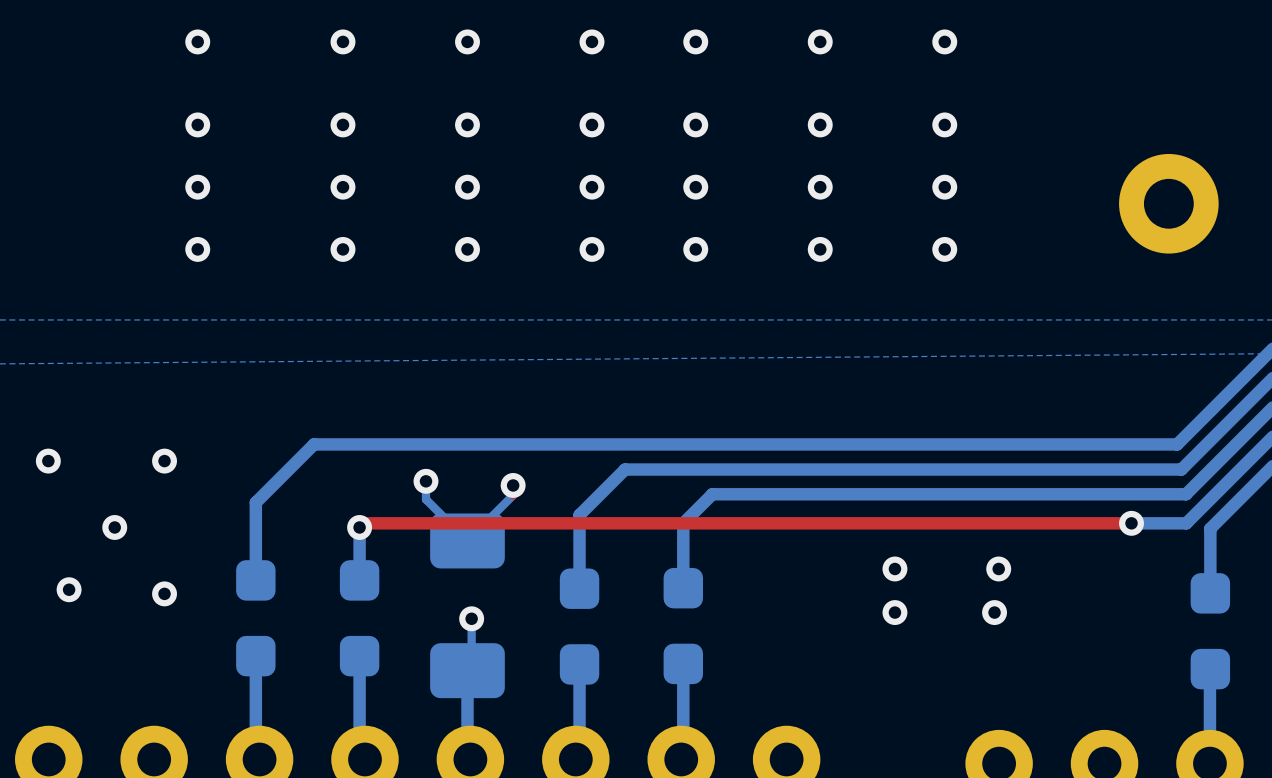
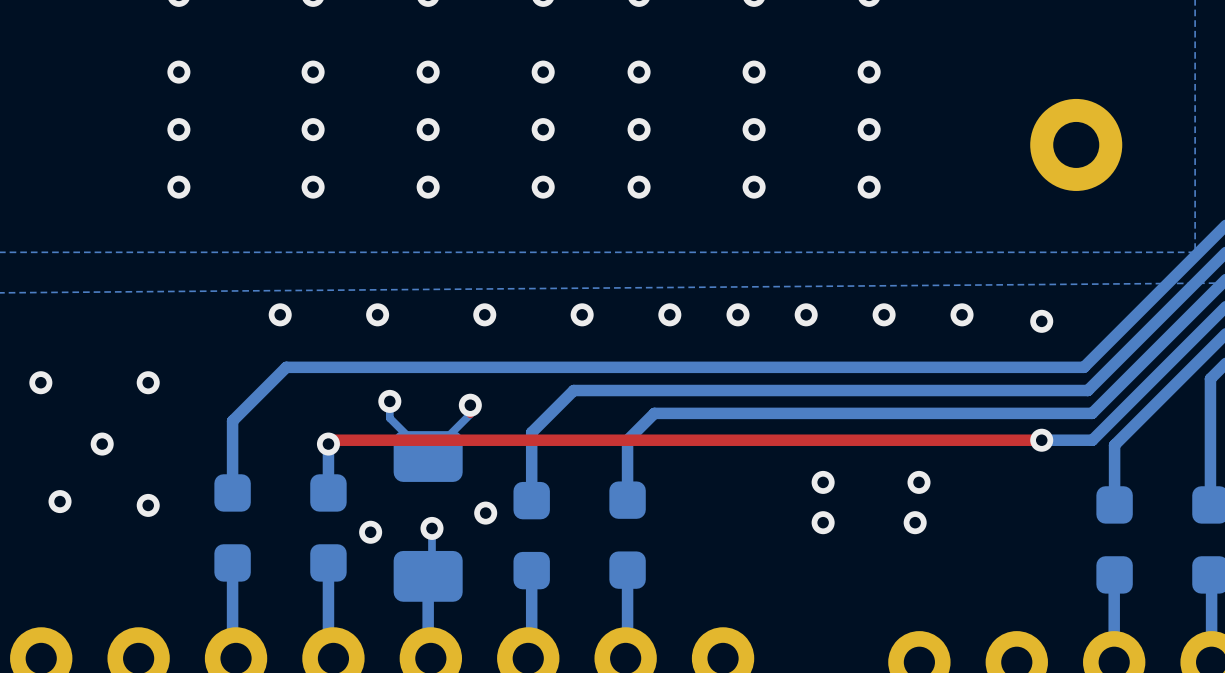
via: none -> (280, 314)
via: none -> (377, 314)
via: none -> (484, 314)
via: none -> (582, 314)
via: none -> (669, 314)
via: none -> (738, 314)
via: none -> (806, 314)
via: none -> (884, 314)
via: none -> (962, 314)
via: none -> (1041, 321)
via: none -> (485, 513)
via: none -> (370, 532)

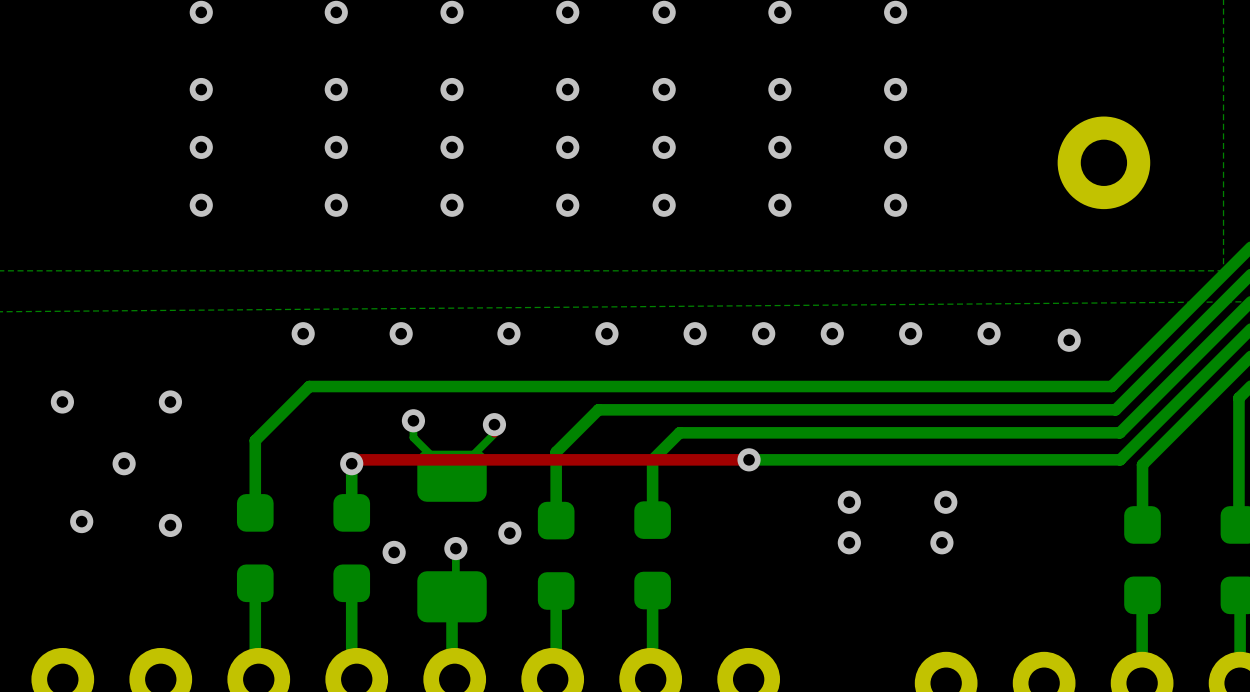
top track: (723, 440) (1041, 440) -> none
bottom track: none -> (749, 459) (1069, 459)
via: none -> (749, 459)
via: (1041, 440) -> none

